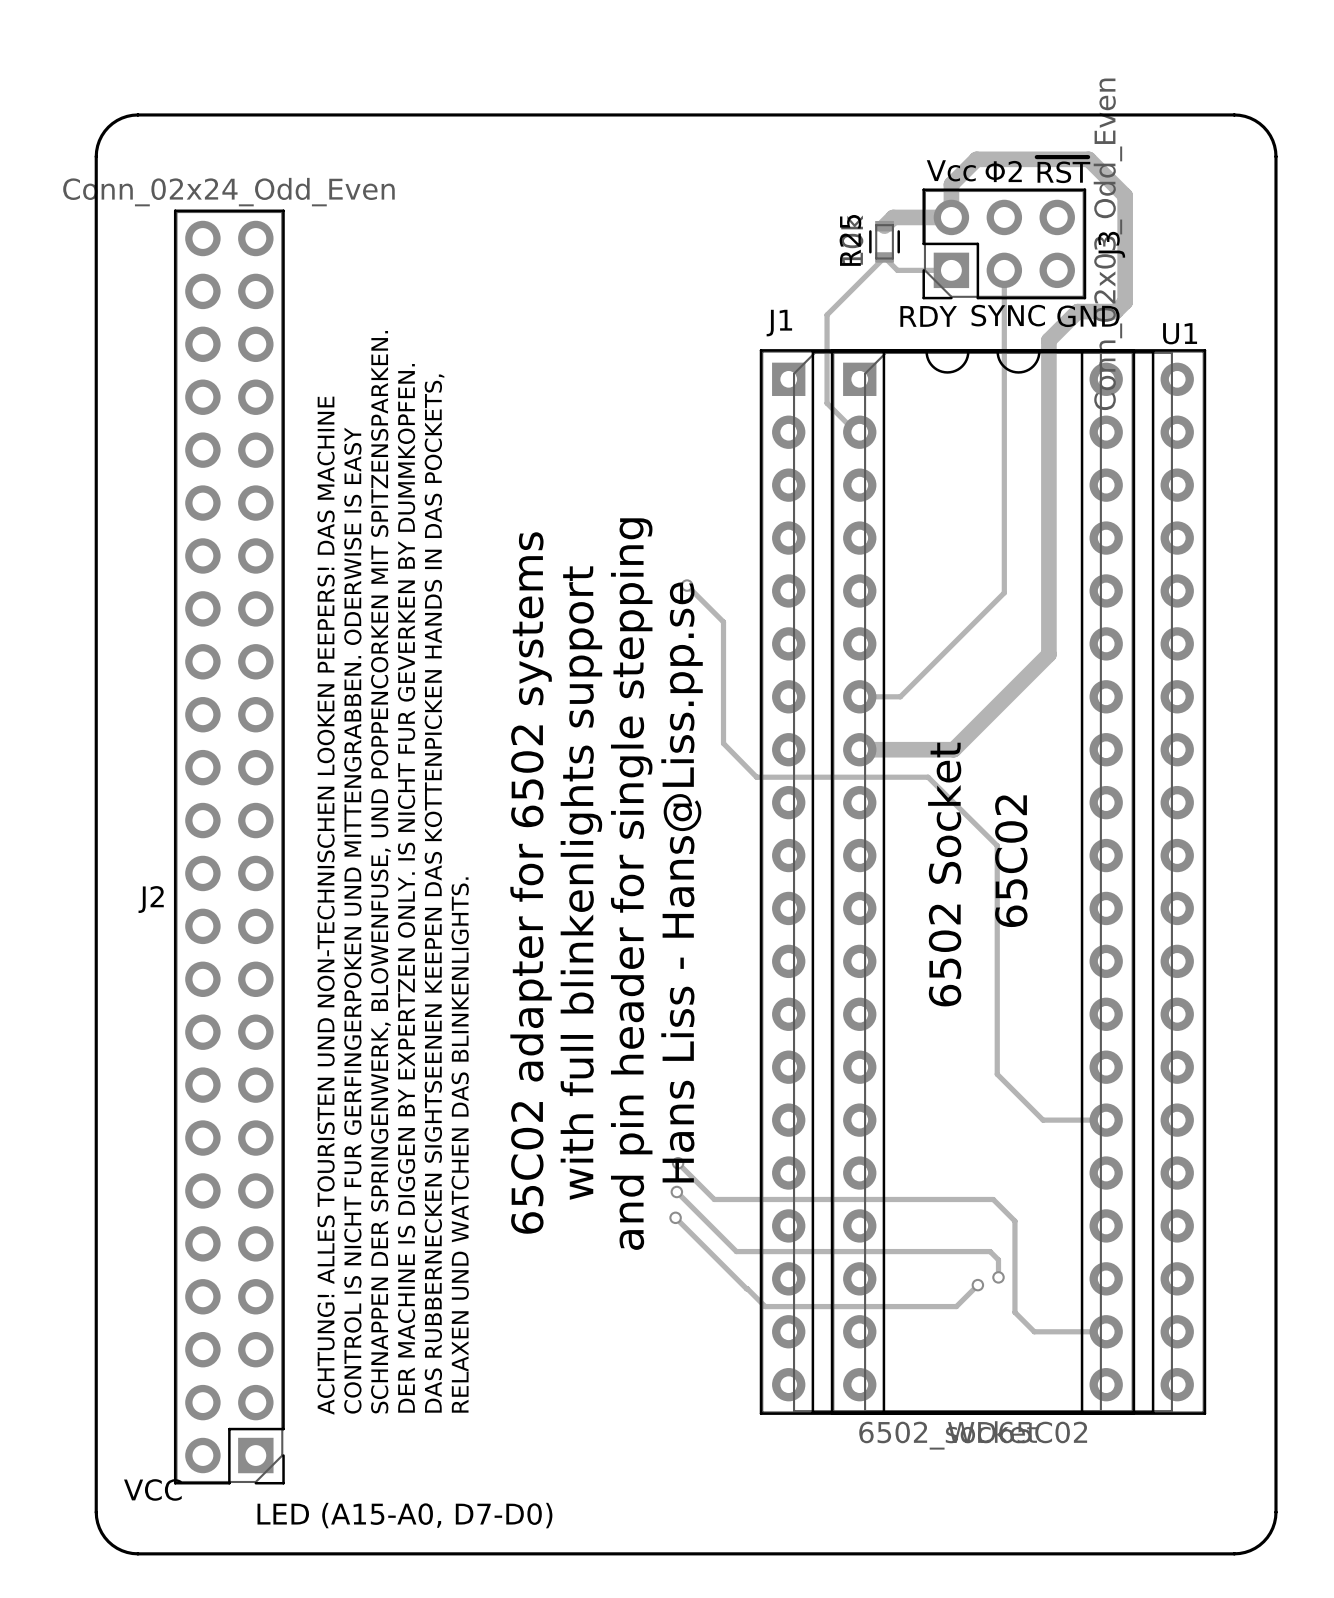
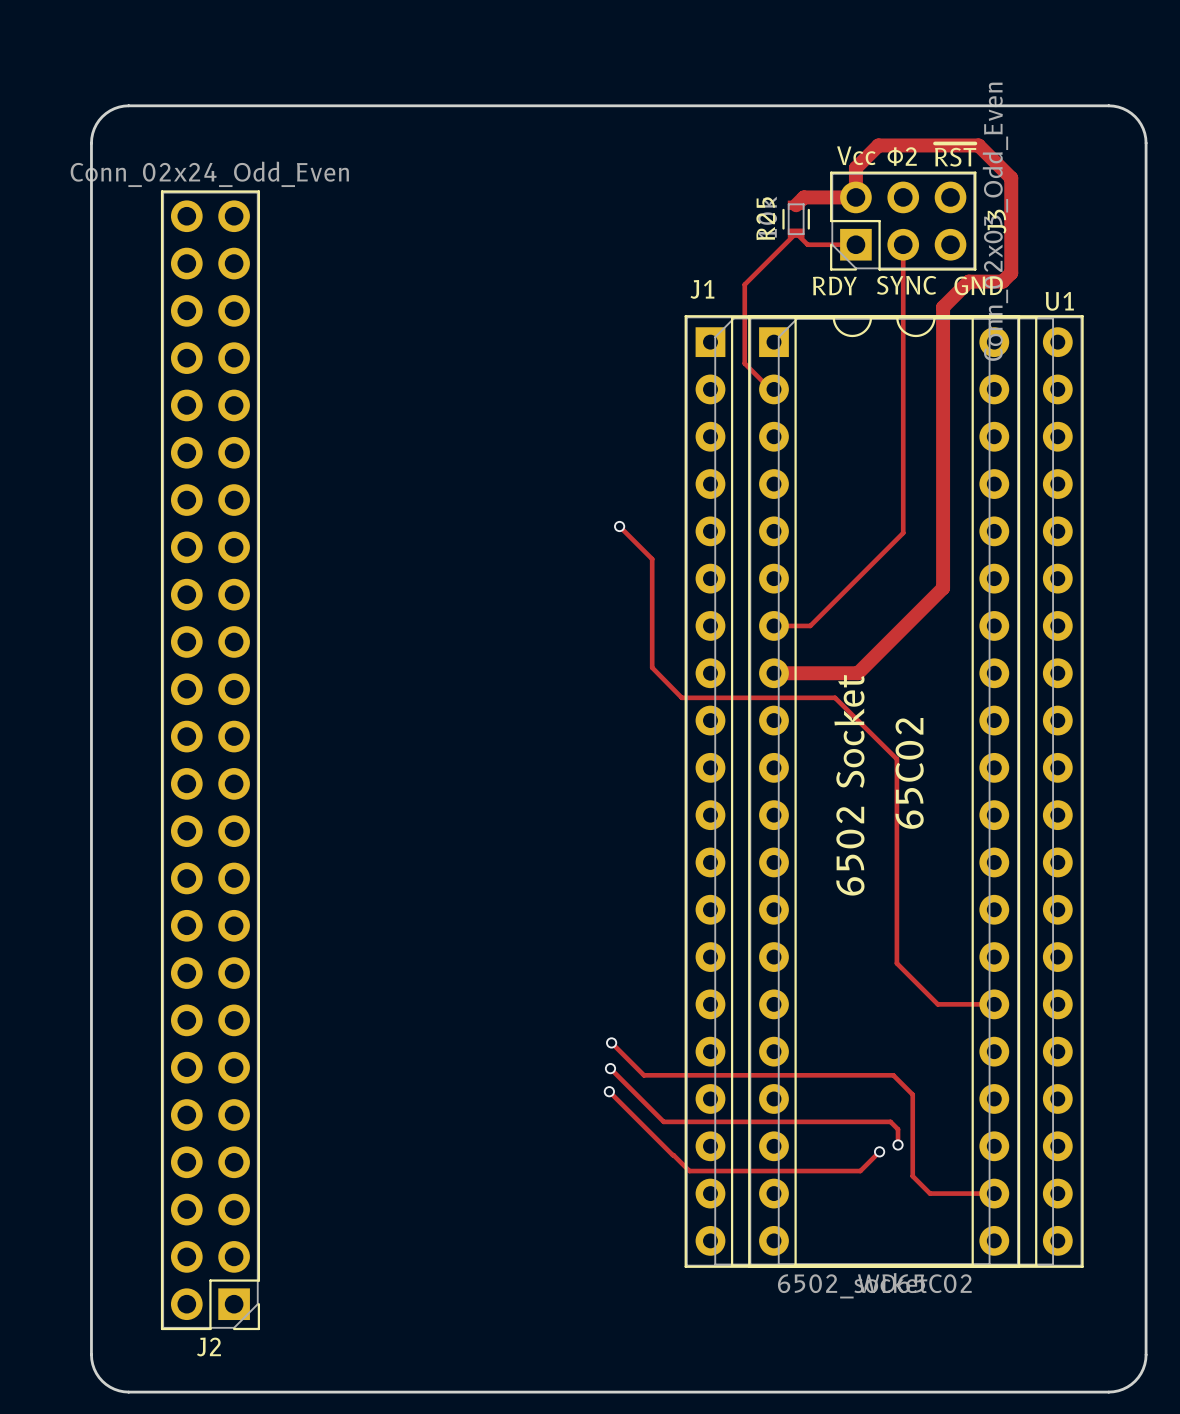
text: SCHNAPPEN DER SPRINGENWERK, BLOWENFUSE, UND POPPENCORKEN MIT SPITZENSPARKEN. (380, 872) -> none
text: Hans Liss - Hans@Liss.pp.se (682, 882) -> none
text: 65C02 adapter for 6502 systems (531, 883) -> none
text: with full blinkenlights support (581, 883) -> none
text: and pin header for single stepping (631, 884) -> none
text: DER MACHINE IS DIGGEN BY EXPERTZEN ONLY. IS NICHT FUR GEVERKEN BY DUMMKOPFEN. (406, 888) -> none
text: DAS RUBBERNECKEN SIGHTSEENEN KEEPEN DAS KOTTENPICKEN HANDS IN DAS POCKETS, (434, 893) -> none
J2 name position: J2 (151, 899) -> J2 (208, 1346)
text: ACHTUNG! ALLES TOURISTEN UND NON-TECHNISCHEN LOOKEN PEEPERS! DAS MACHINE (326, 905) -> none
text: CONTROL IS NICHT FUR GERFINGERPOKEN UND MITTENGRABBEN. ODERWISE IS EASY (352, 920) -> none
text: RELAXEN UND WATCHEN DAS BLINKENLIGHTS. (460, 1145) -> none
text: VCC (152, 1489) -> none
text: LED (A15-A0, D7-D0) (404, 1515) -> none

